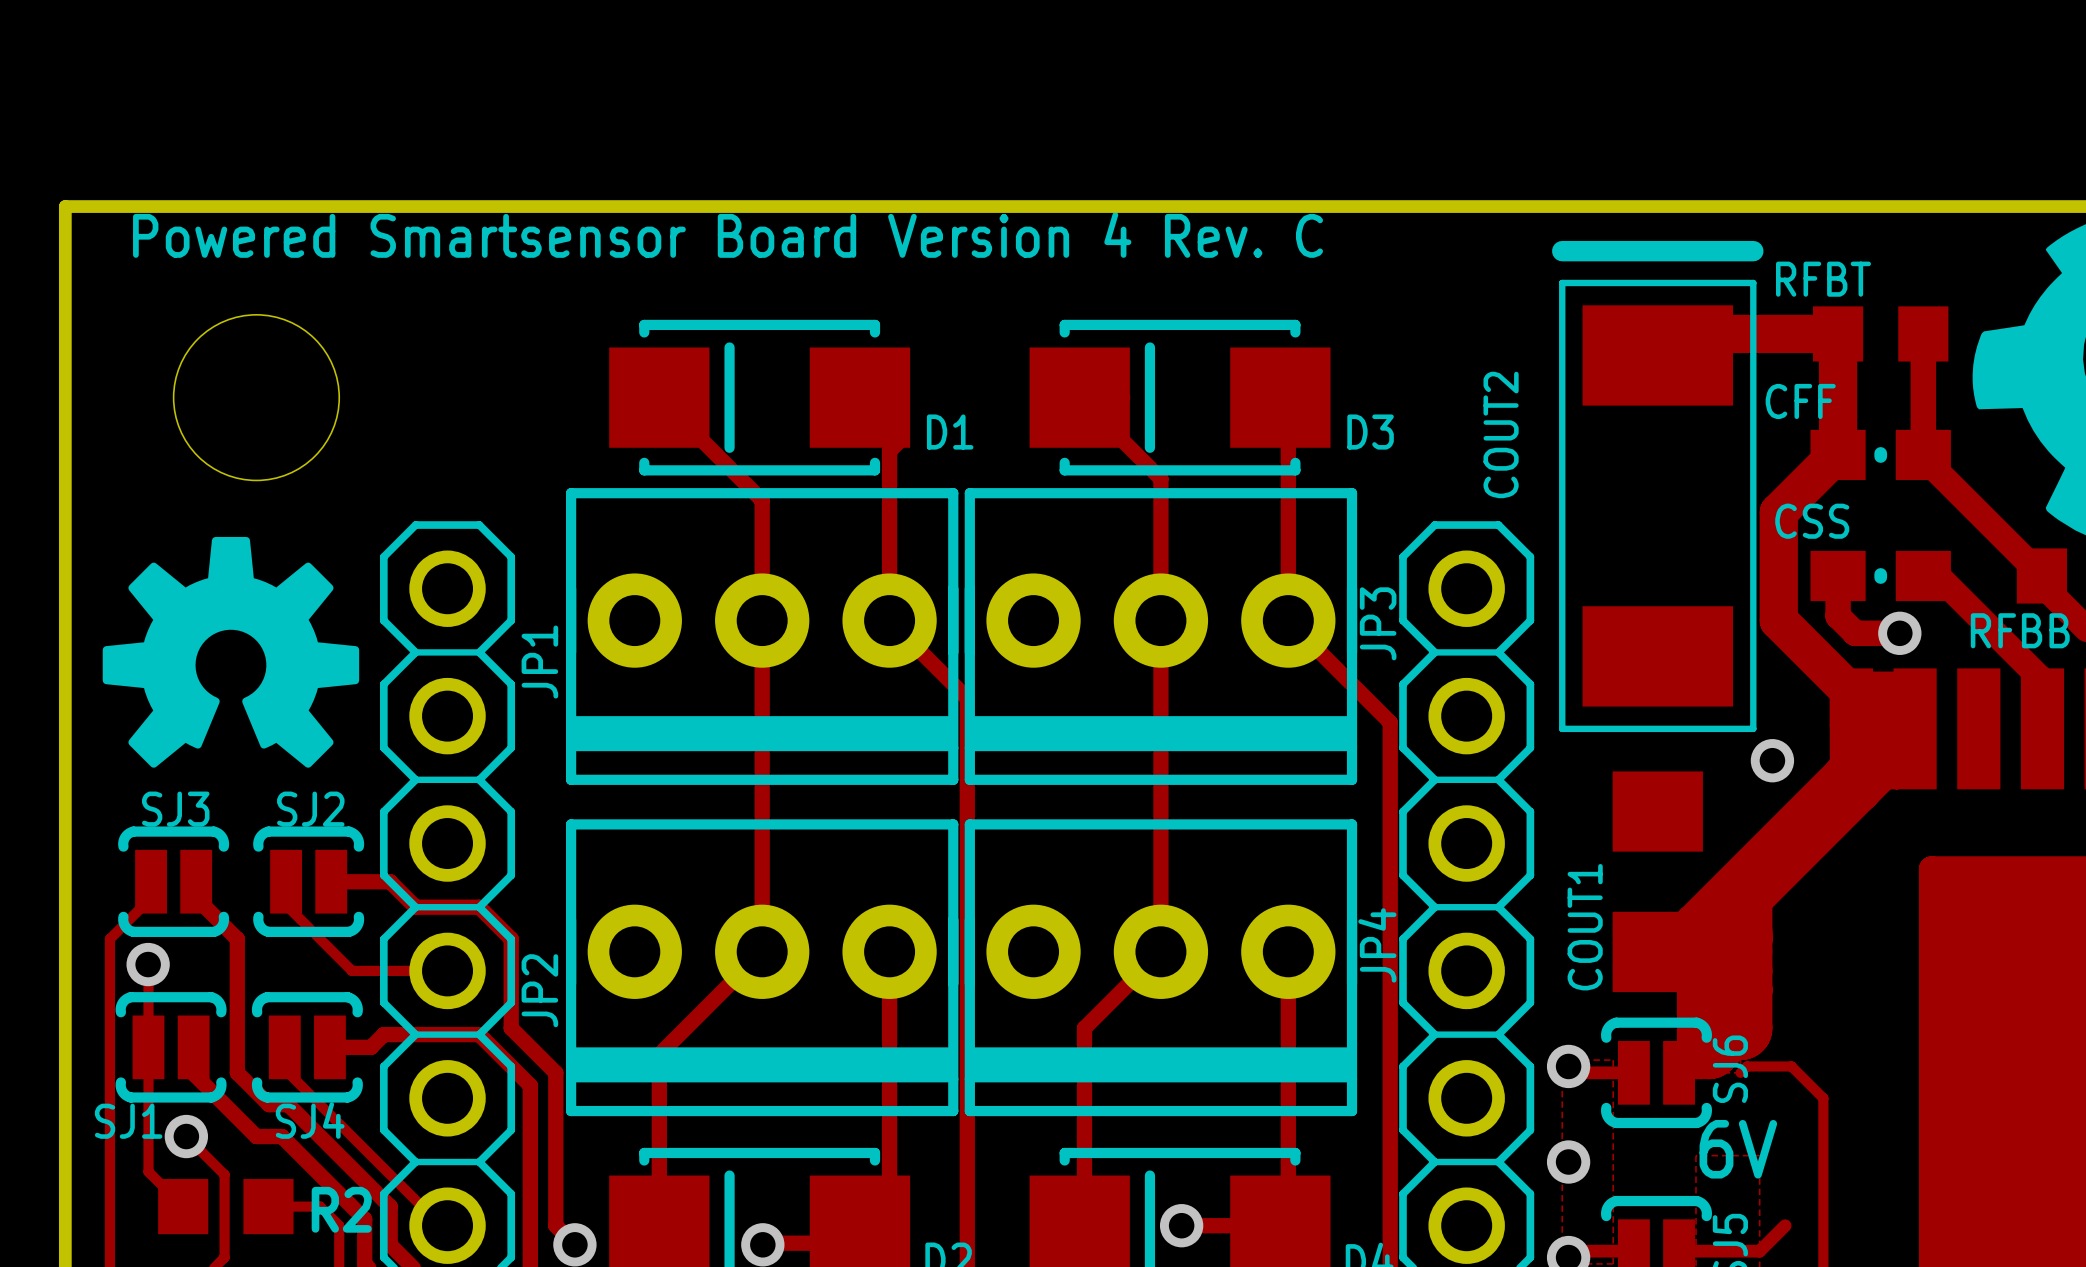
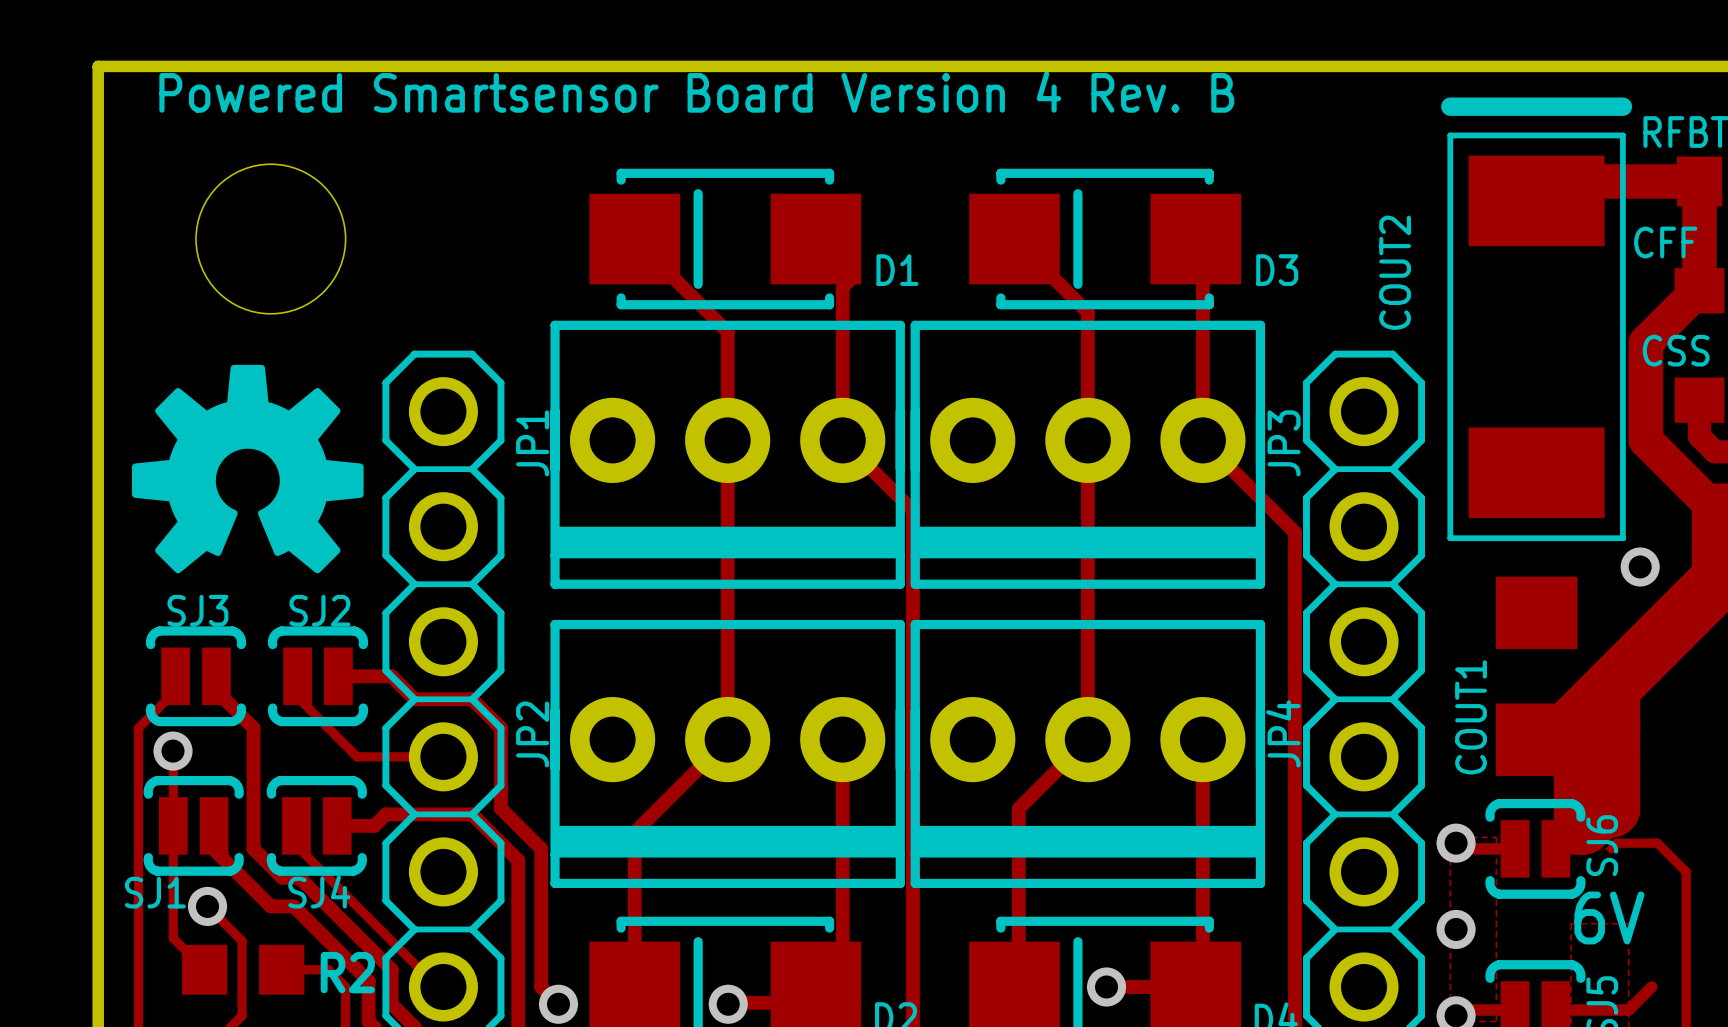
text: Powered Smartsensor Board Version 4 Rev. C (728, 234) -> Powered Smartsensor Board Version 4 Rev. B (696, 92)
JP1 name position: JP1 (539, 662) -> JP1 (532, 443)
JP2 name position: JP2 (539, 990) -> JP2 (532, 734)

